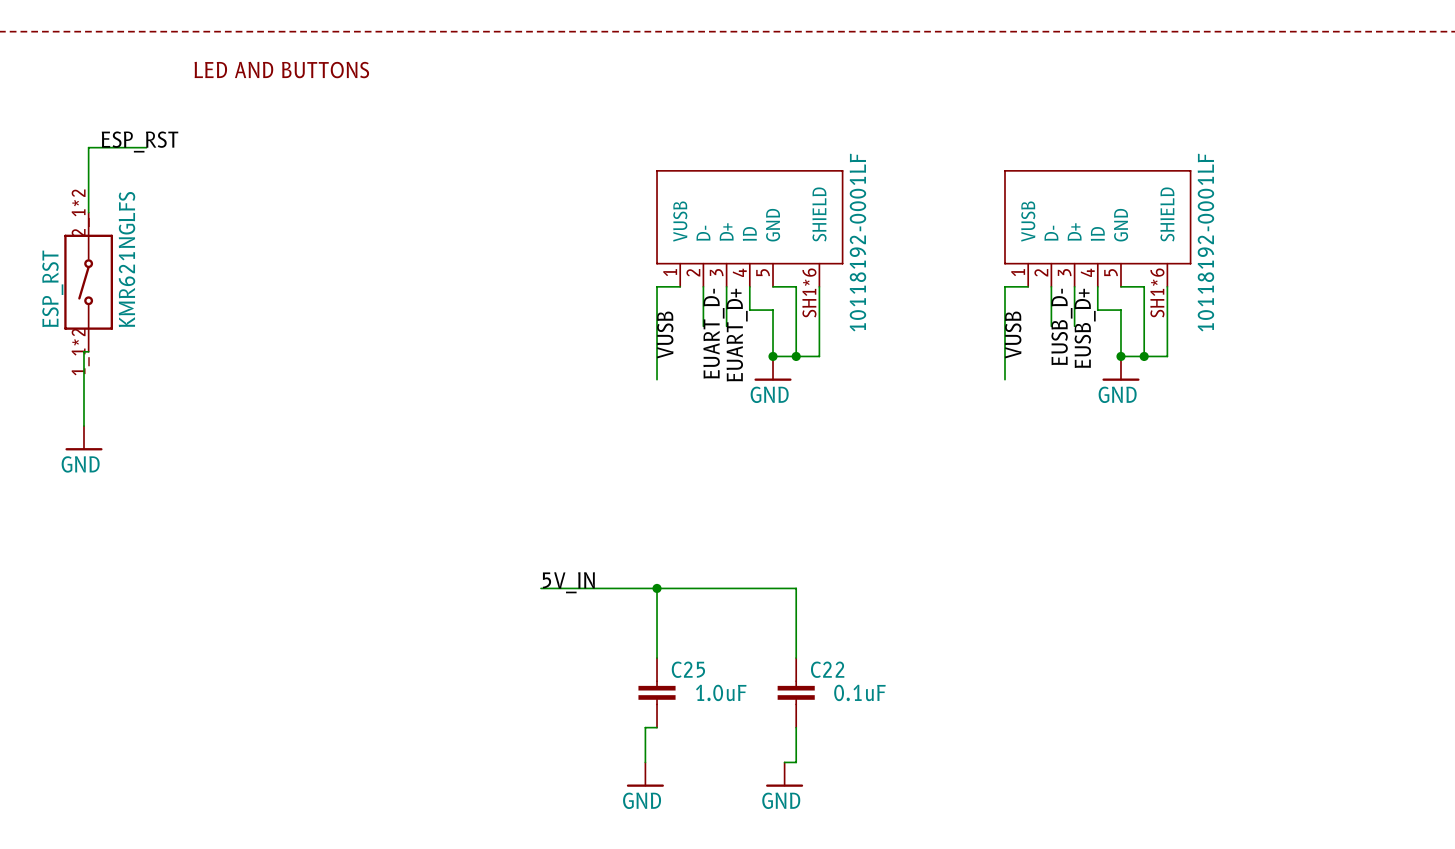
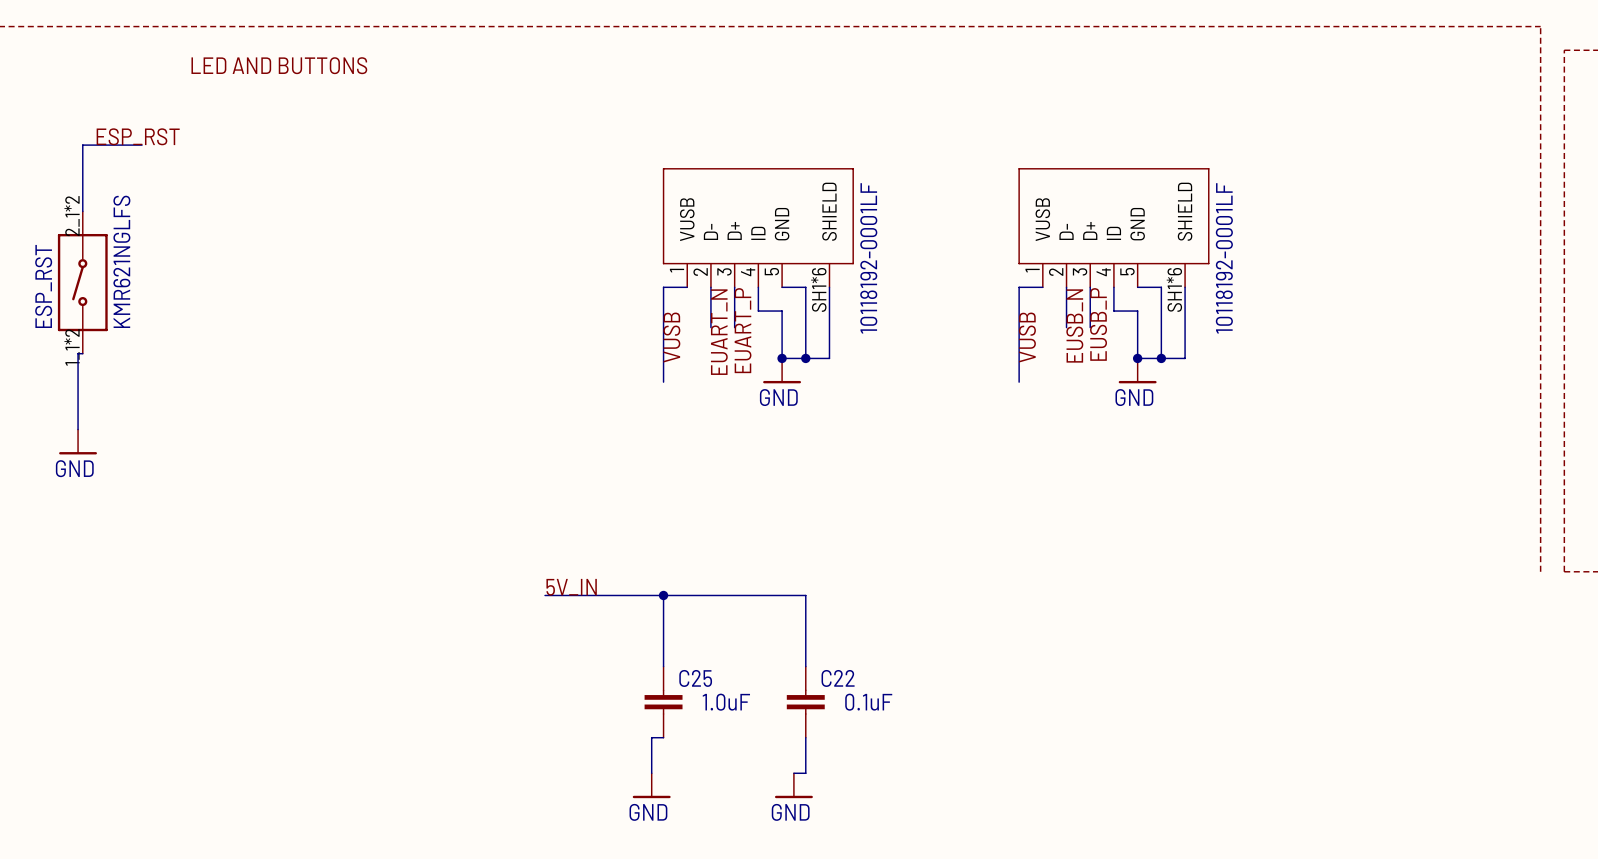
label: EUSB_D- (1061, 326) -> EUSB_N (1074, 325)
label: EUSB_D+ (1085, 328) -> EUSB_P (1098, 324)
label: EUART_D- (713, 333) -> EUART_N (719, 332)
label: EUART_D+ (737, 335) -> EUART_P (743, 330)

